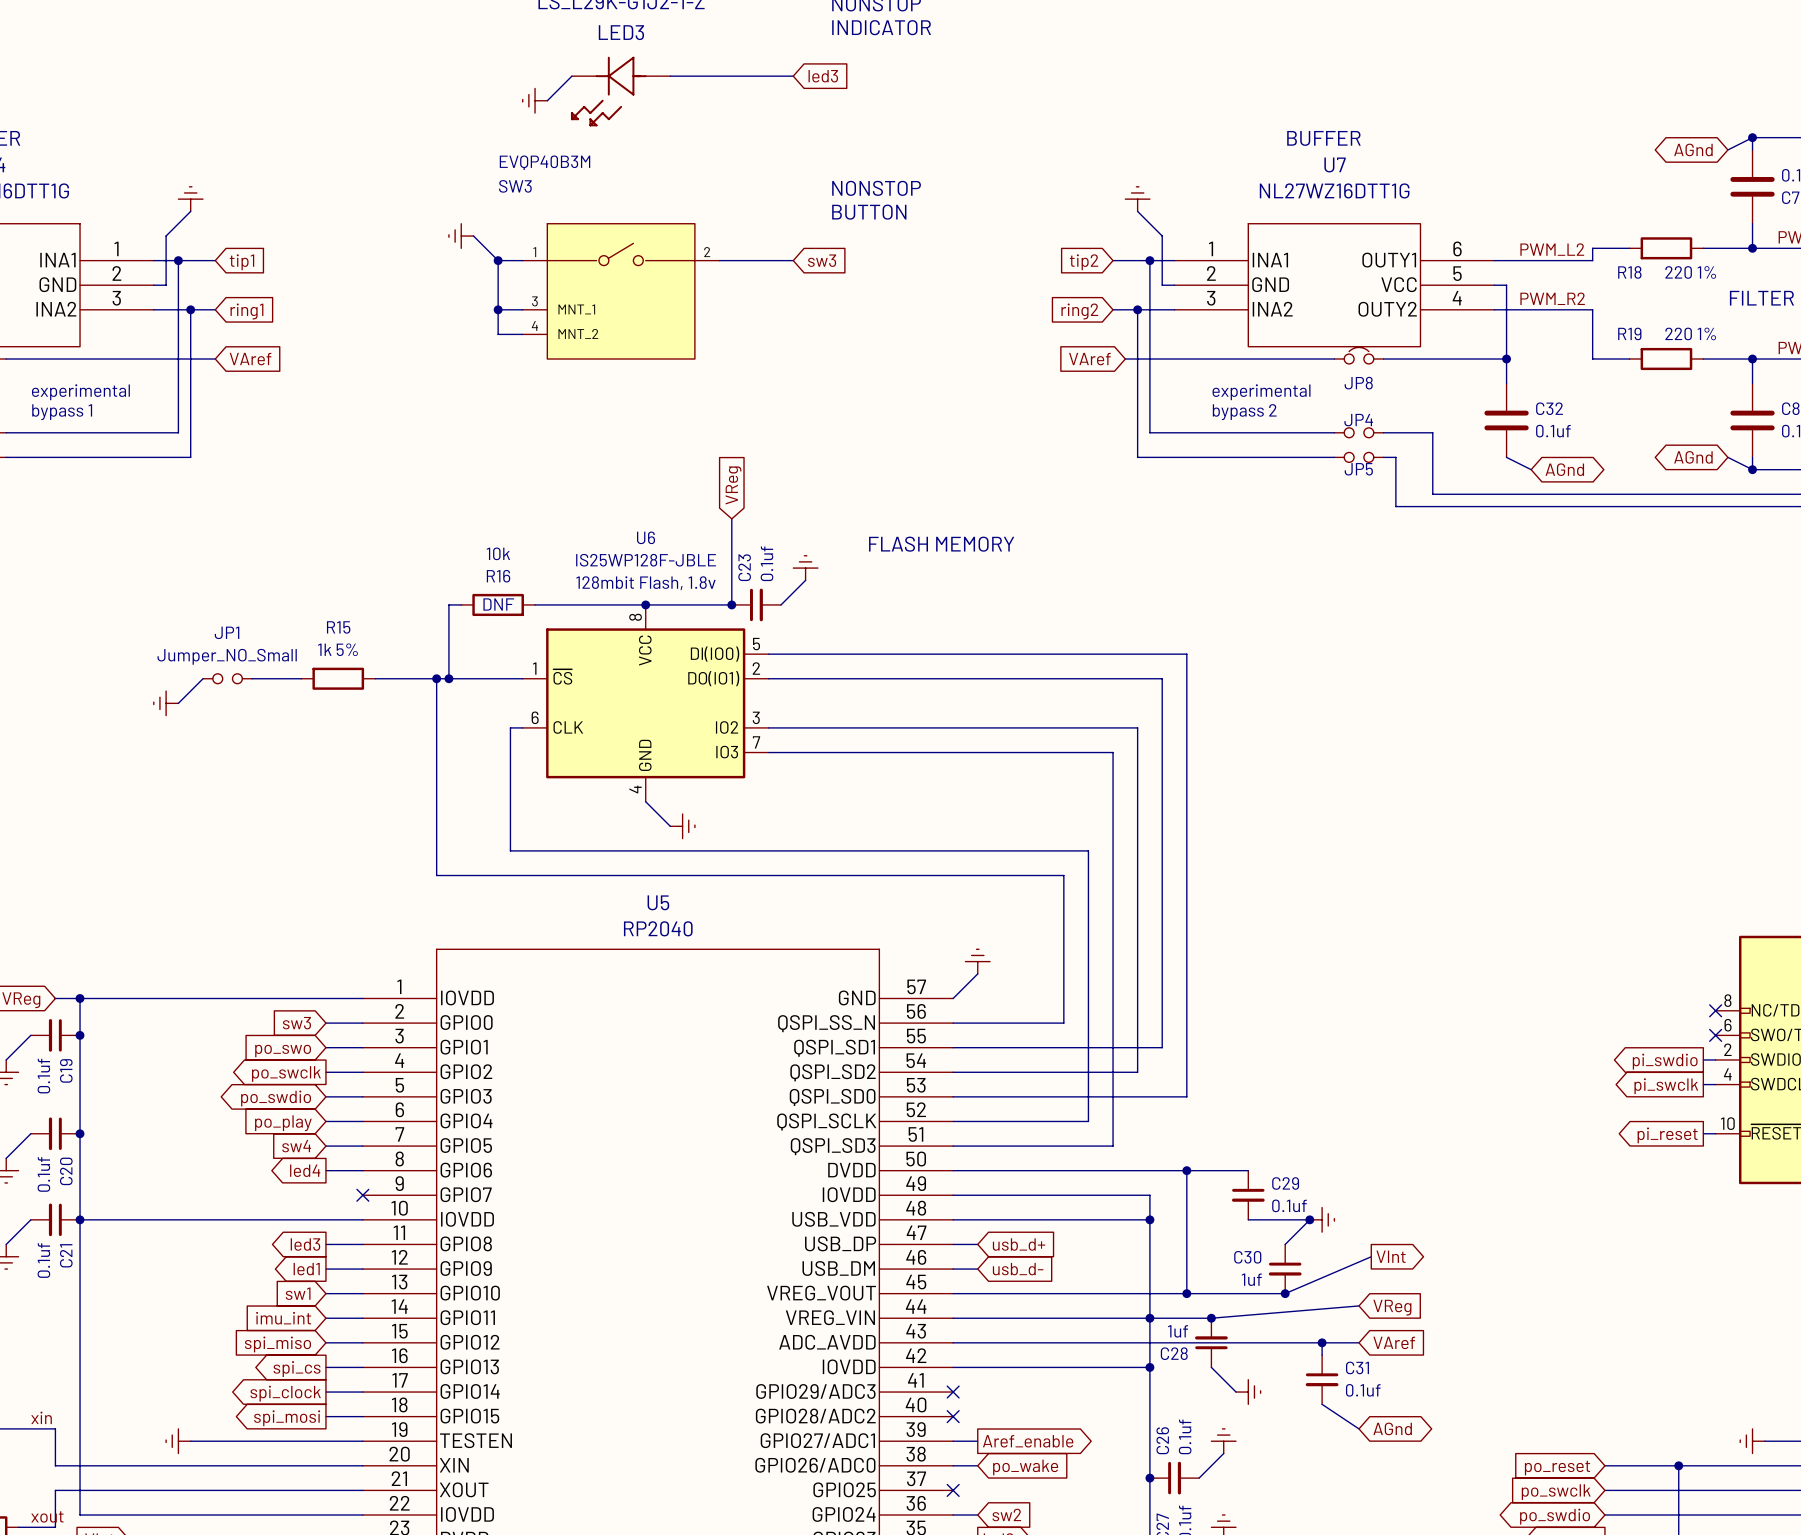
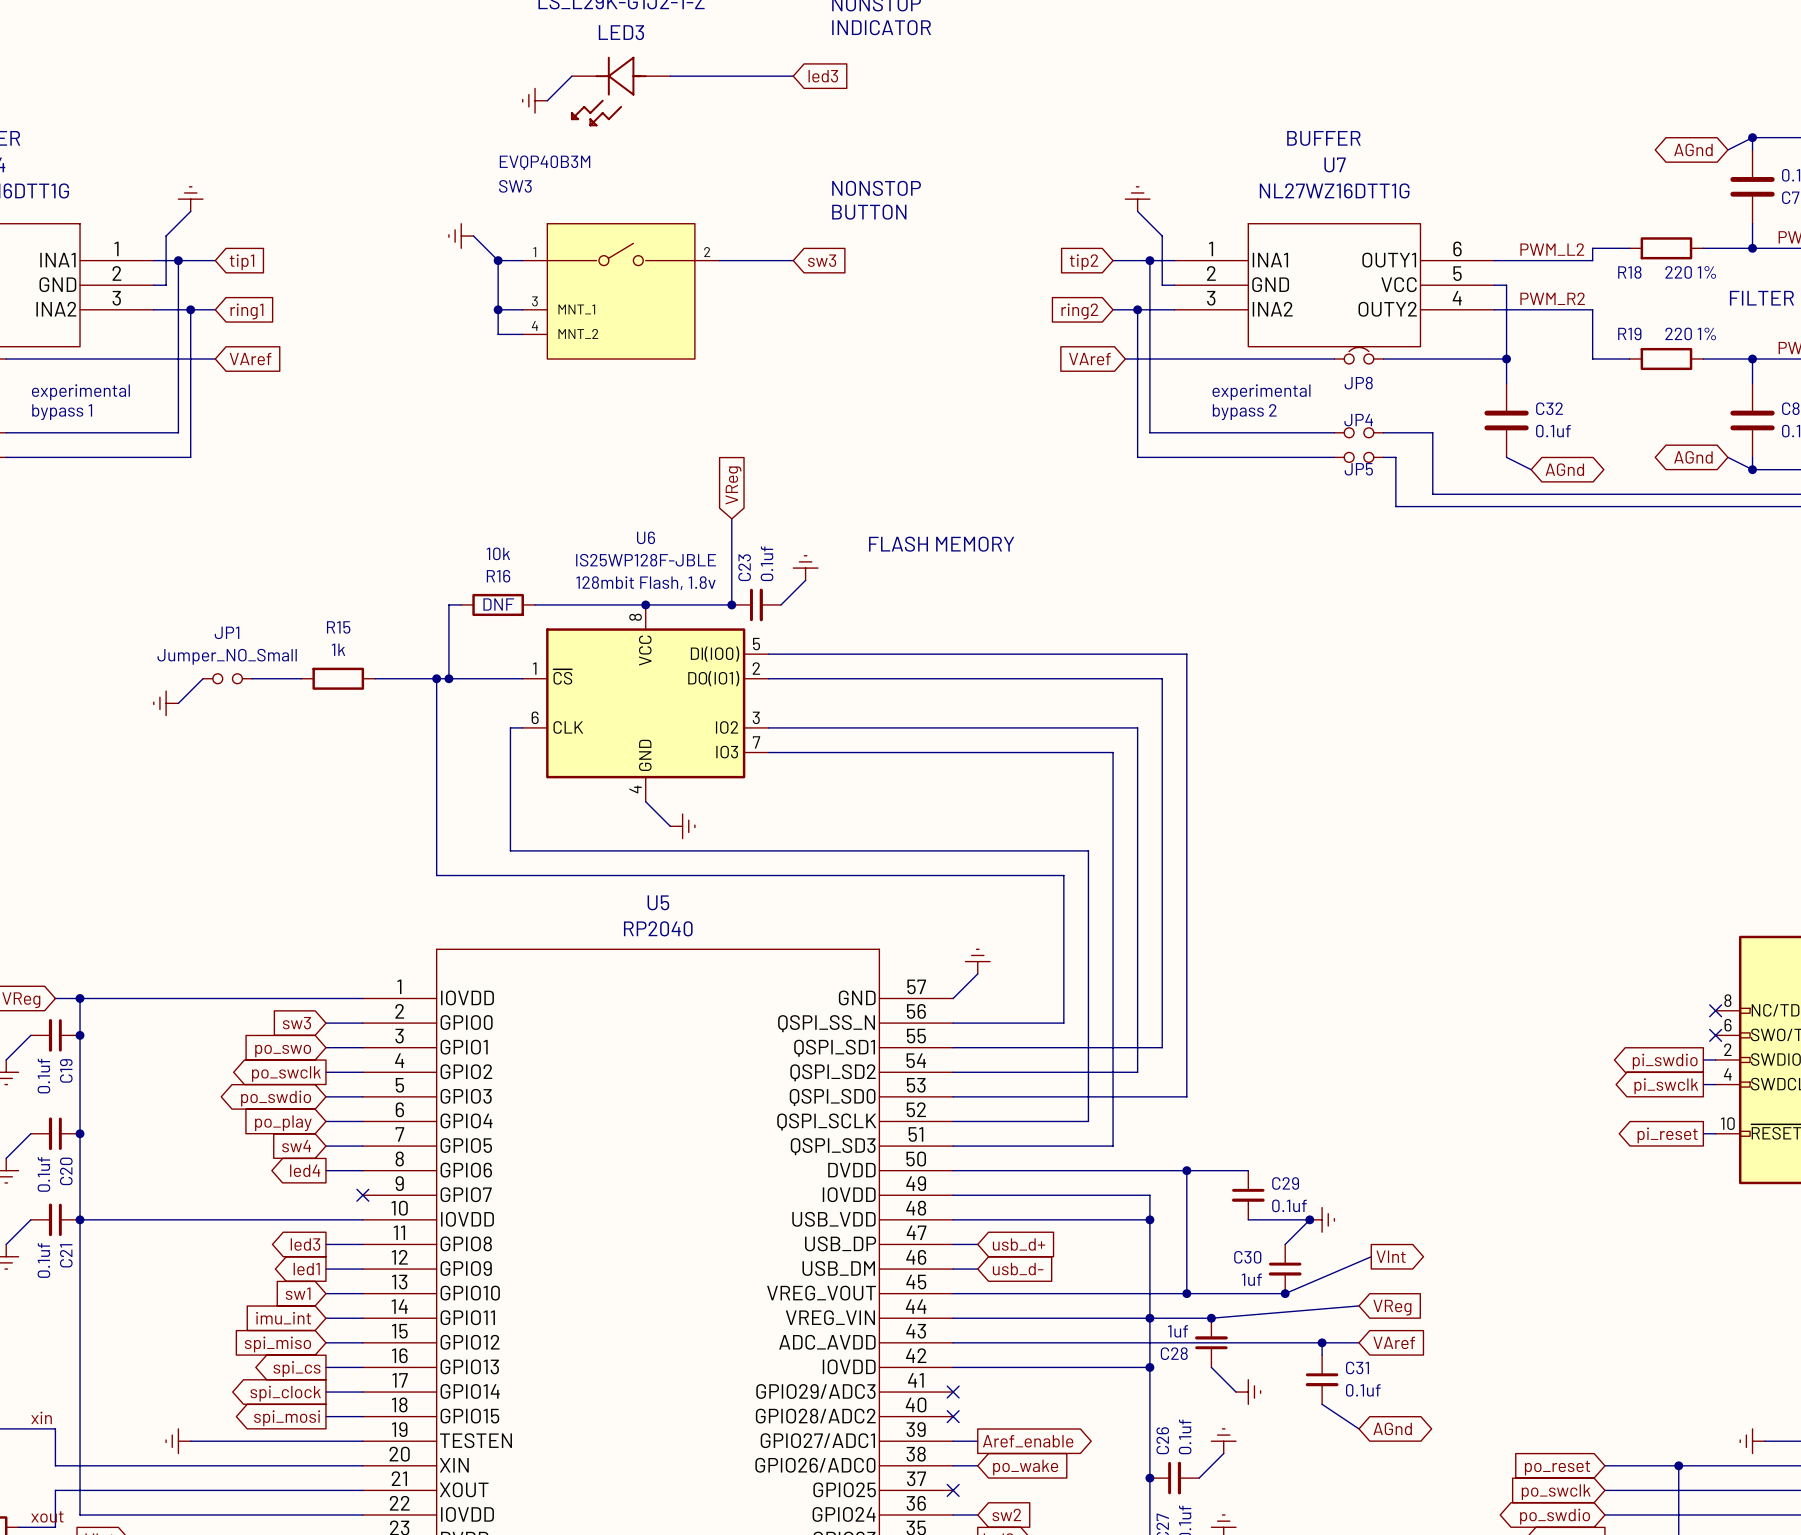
R15 value: 1k 5% (337, 649) -> 1k (338, 649)

